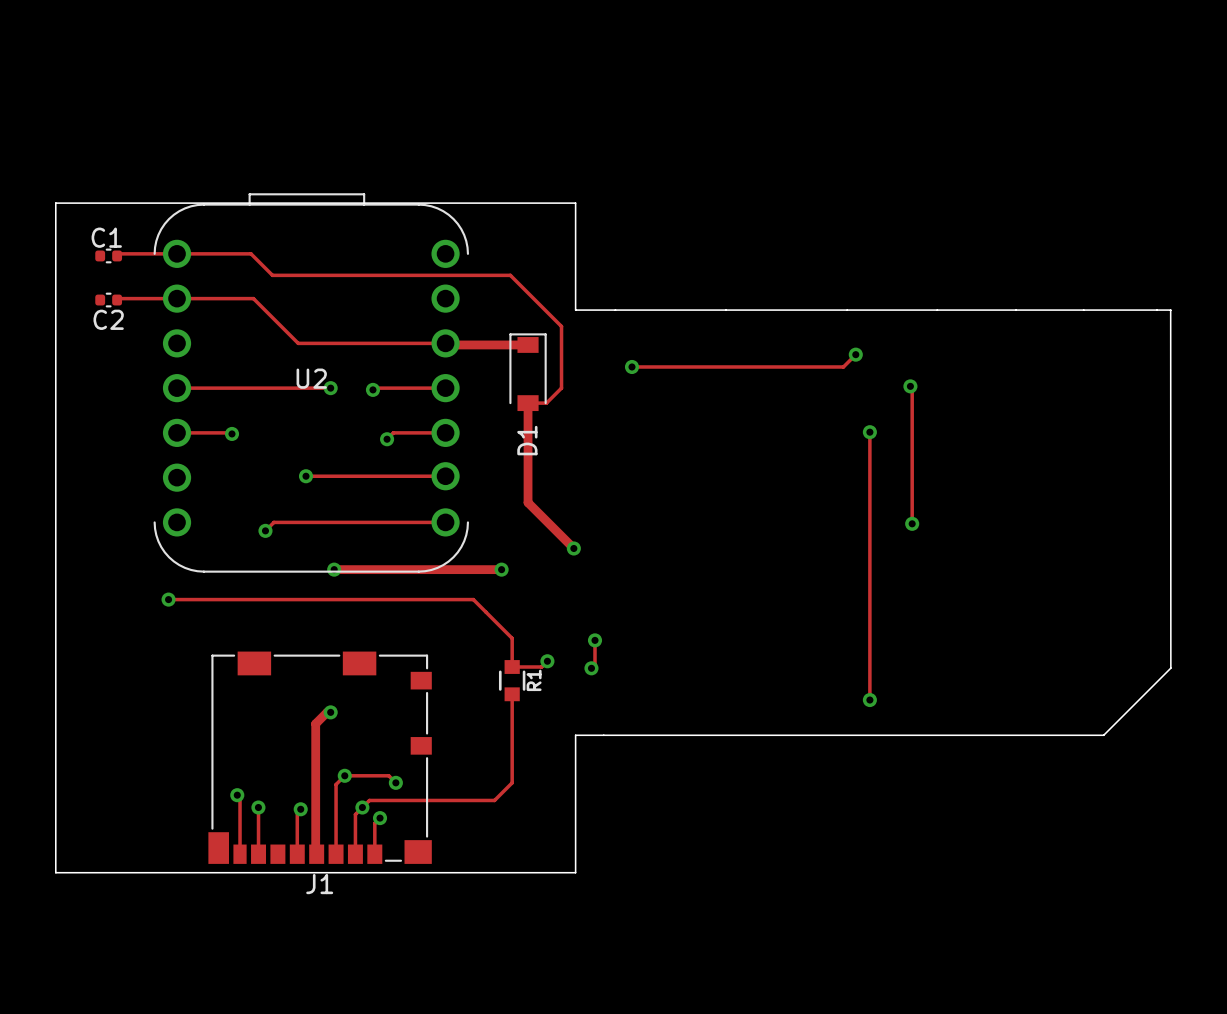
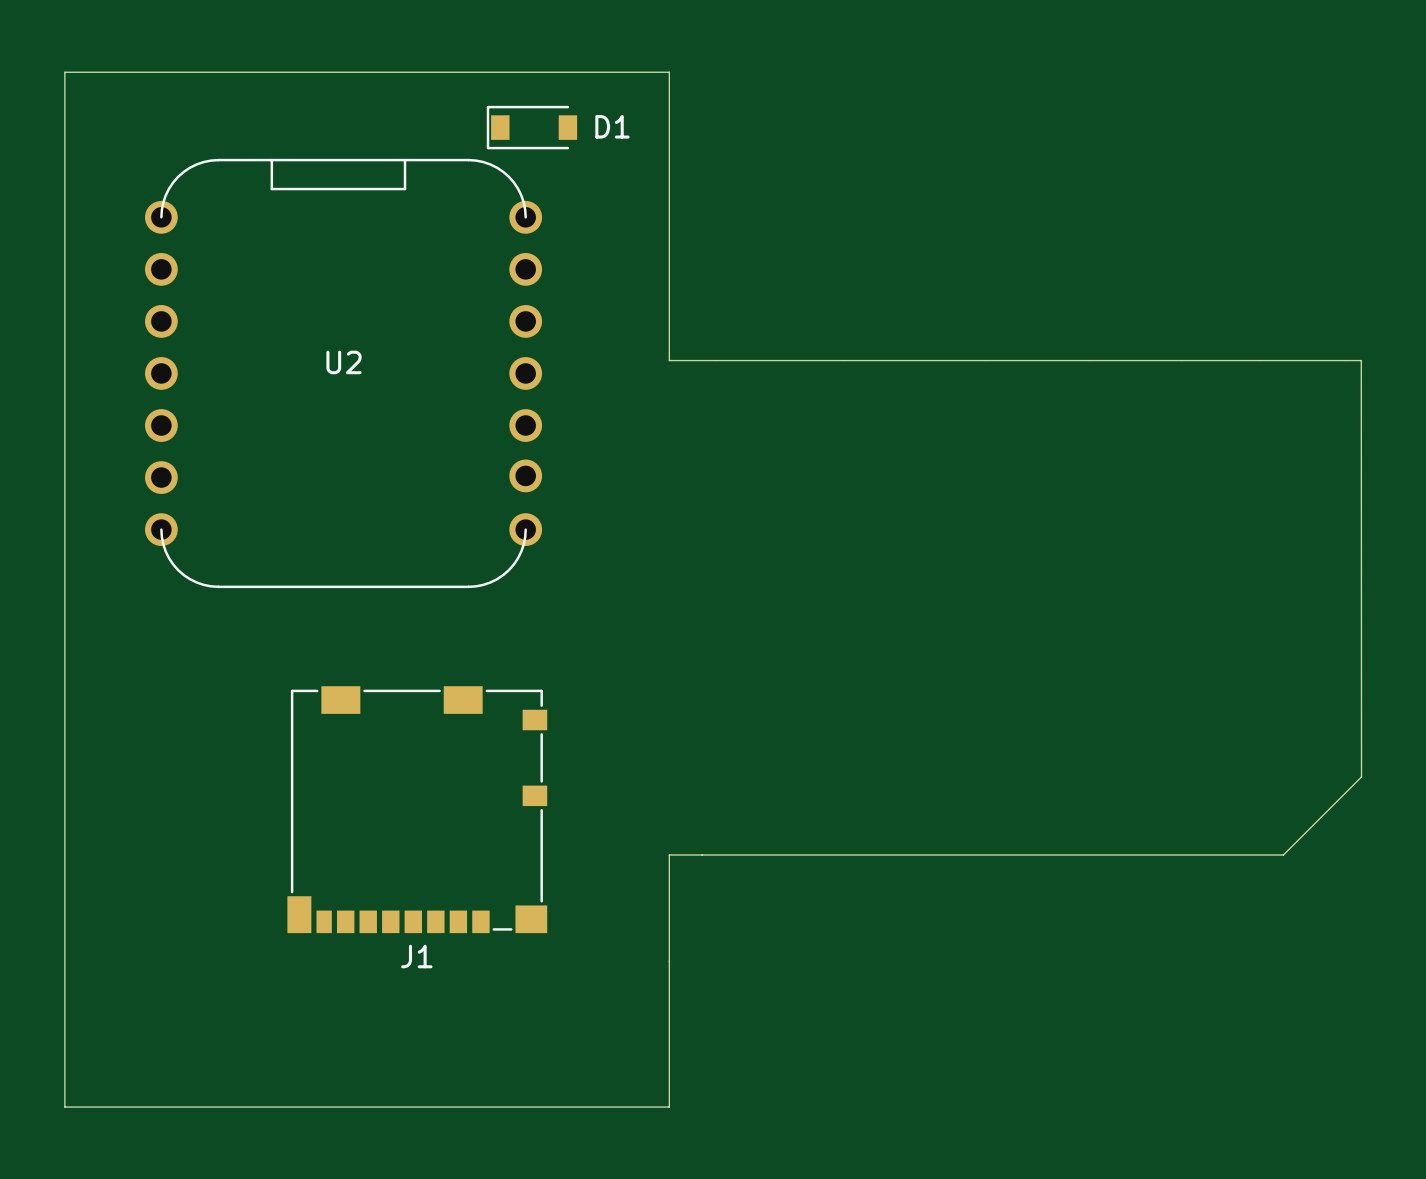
U2 footprint: [153, 193, 470, 573] -> [144, 158, 543, 589]
board edge: (55, 203) (575, 203) -> (64, 236) (64, 72) (669, 72) (669, 236)
C1: (108, 255) -> none
track: (117, 255) (119, 253) (251, 253) (272, 275) (510, 275) (561, 326) (561, 388) (546, 403) (528, 403) (528, 502) (573, 548) -> none
C2: (108, 300) -> none
track: (117, 300) (253, 298) (298, 343) (528, 344) -> none
track: (855, 354) (843, 366) (632, 366) -> none
via: (855, 354) -> none
via: (632, 366) -> none
D1 rotation: 0° (528, 372) -> 90° counterclockwise (531, 127)
D1 position: (528, 372) -> (531, 127)
track: (910, 386) (912, 388) (912, 523) -> none
via: (910, 386) -> none
track: (177, 388) (330, 388) -> none
via: (330, 388) -> none
track: (445, 388) (374, 388) (372, 389) -> none
via: (372, 389) -> none
track: (177, 432) (232, 433) -> none
track: (445, 432) (393, 432) (387, 439) -> none
track: (869, 432) (869, 700) -> none
via: (869, 432) -> none
via: (232, 433) -> none
via: (387, 439) -> none
track: (306, 476) (445, 476) -> none
via: (306, 476) -> none
track: (445, 522) (273, 522) (265, 530) -> none
via: (912, 523) -> none
via: (265, 530) -> none
via: (573, 548) -> none
track: (334, 569) (501, 569) -> none
via: (334, 569) -> none
via: (501, 569) -> none
track: (168, 599) (473, 599) (512, 638) (512, 667) (541, 667) (547, 661) -> none
via: (168, 599) -> none
track: (595, 640) (595, 664) (591, 668) -> none
via: (595, 640) -> none
via: (547, 661) -> none
via: (591, 668) -> none
R1: (512, 680) -> none
track: (512, 694) (512, 782) (494, 800) (369, 800) (355, 814) (355, 854) -> none
via: (869, 700) -> none
track: (330, 712) (327, 712) (315, 723) (314, 851) (316, 854) -> none
via: (330, 712) -> none
J1 position: (320, 757) -> (417, 809)
via: (344, 775) -> none
track: (395, 782) (388, 775) (344, 775) (336, 784) (336, 854) -> none
via: (395, 782) -> none
track: (237, 795) (240, 797) (240, 854) -> none
via: (237, 795) -> none
track: (258, 807) (258, 854) -> none
via: (258, 807) -> none
via: (362, 807) -> none
track: (300, 809) (297, 812) (297, 854) -> none
via: (300, 809) -> none
track: (380, 818) (374, 823) (374, 854) -> none
via: (380, 818) -> none
board edge: (55, 872) (575, 872) -> (64, 1014) (64, 1107) (669, 1107) (669, 1014)

